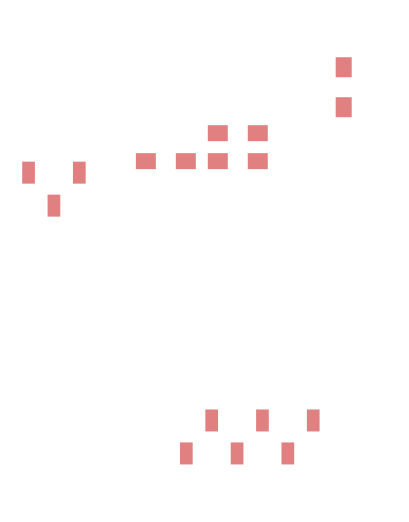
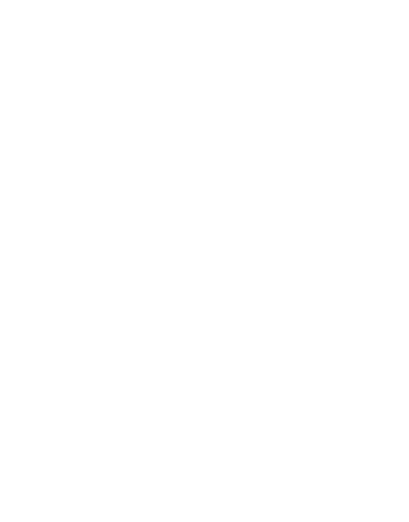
part: (343, 87) -> none
part: (237, 133) -> none
part: (165, 161) -> none
part: (237, 161) -> none
part: (53, 189) -> none
part: (249, 436) -> none

